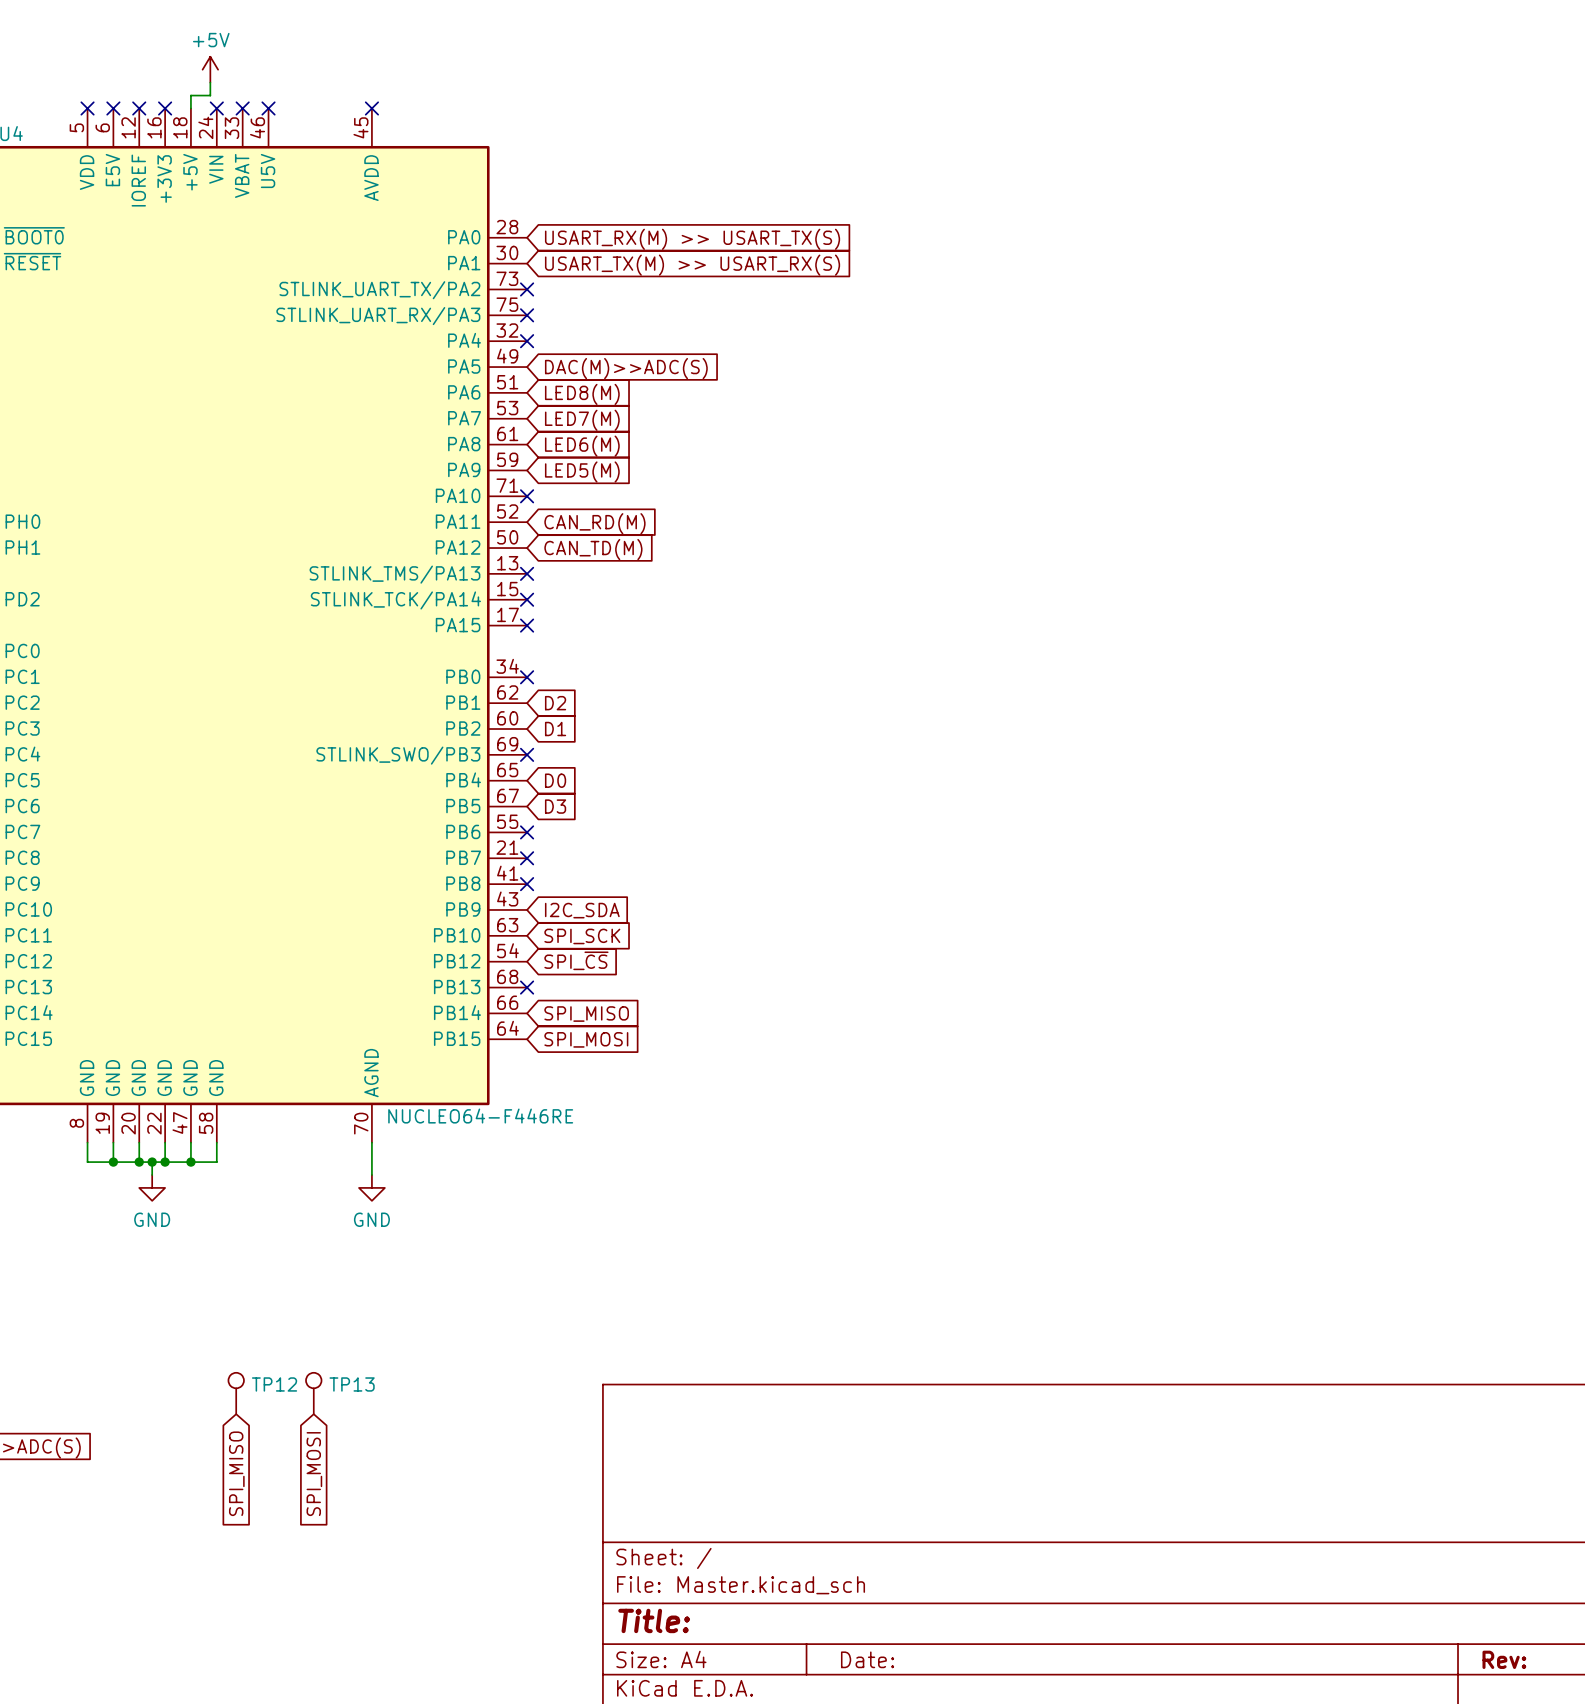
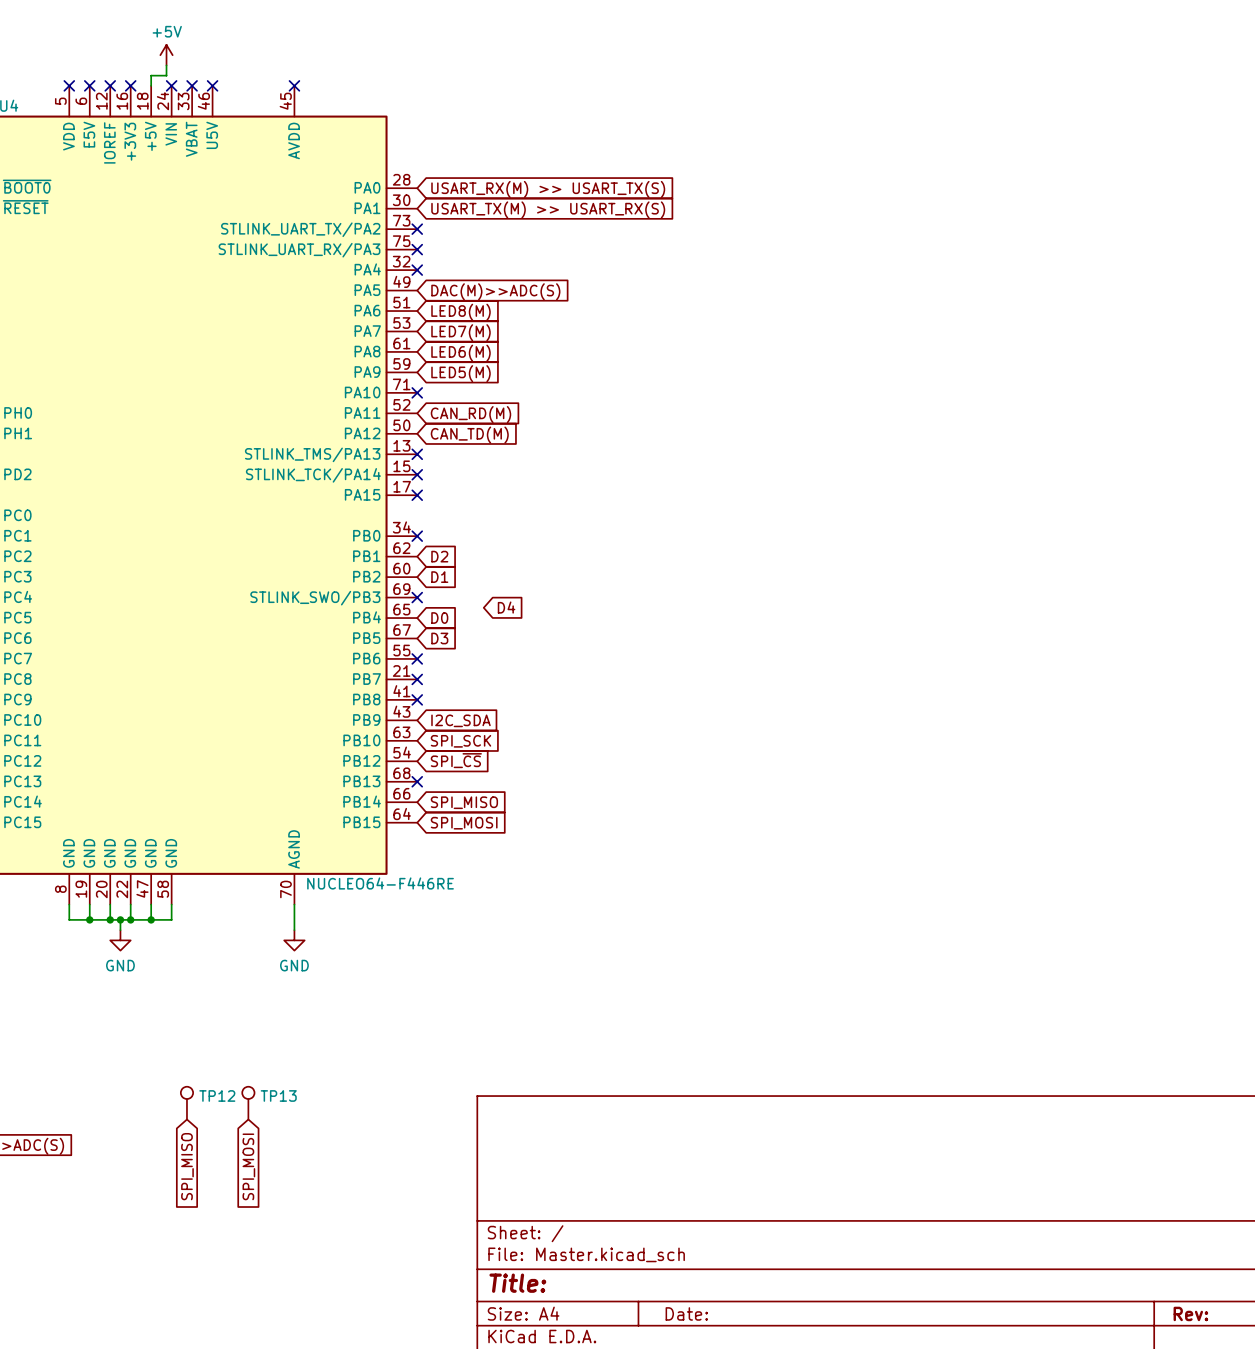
global label: none -> D4 (506, 607)

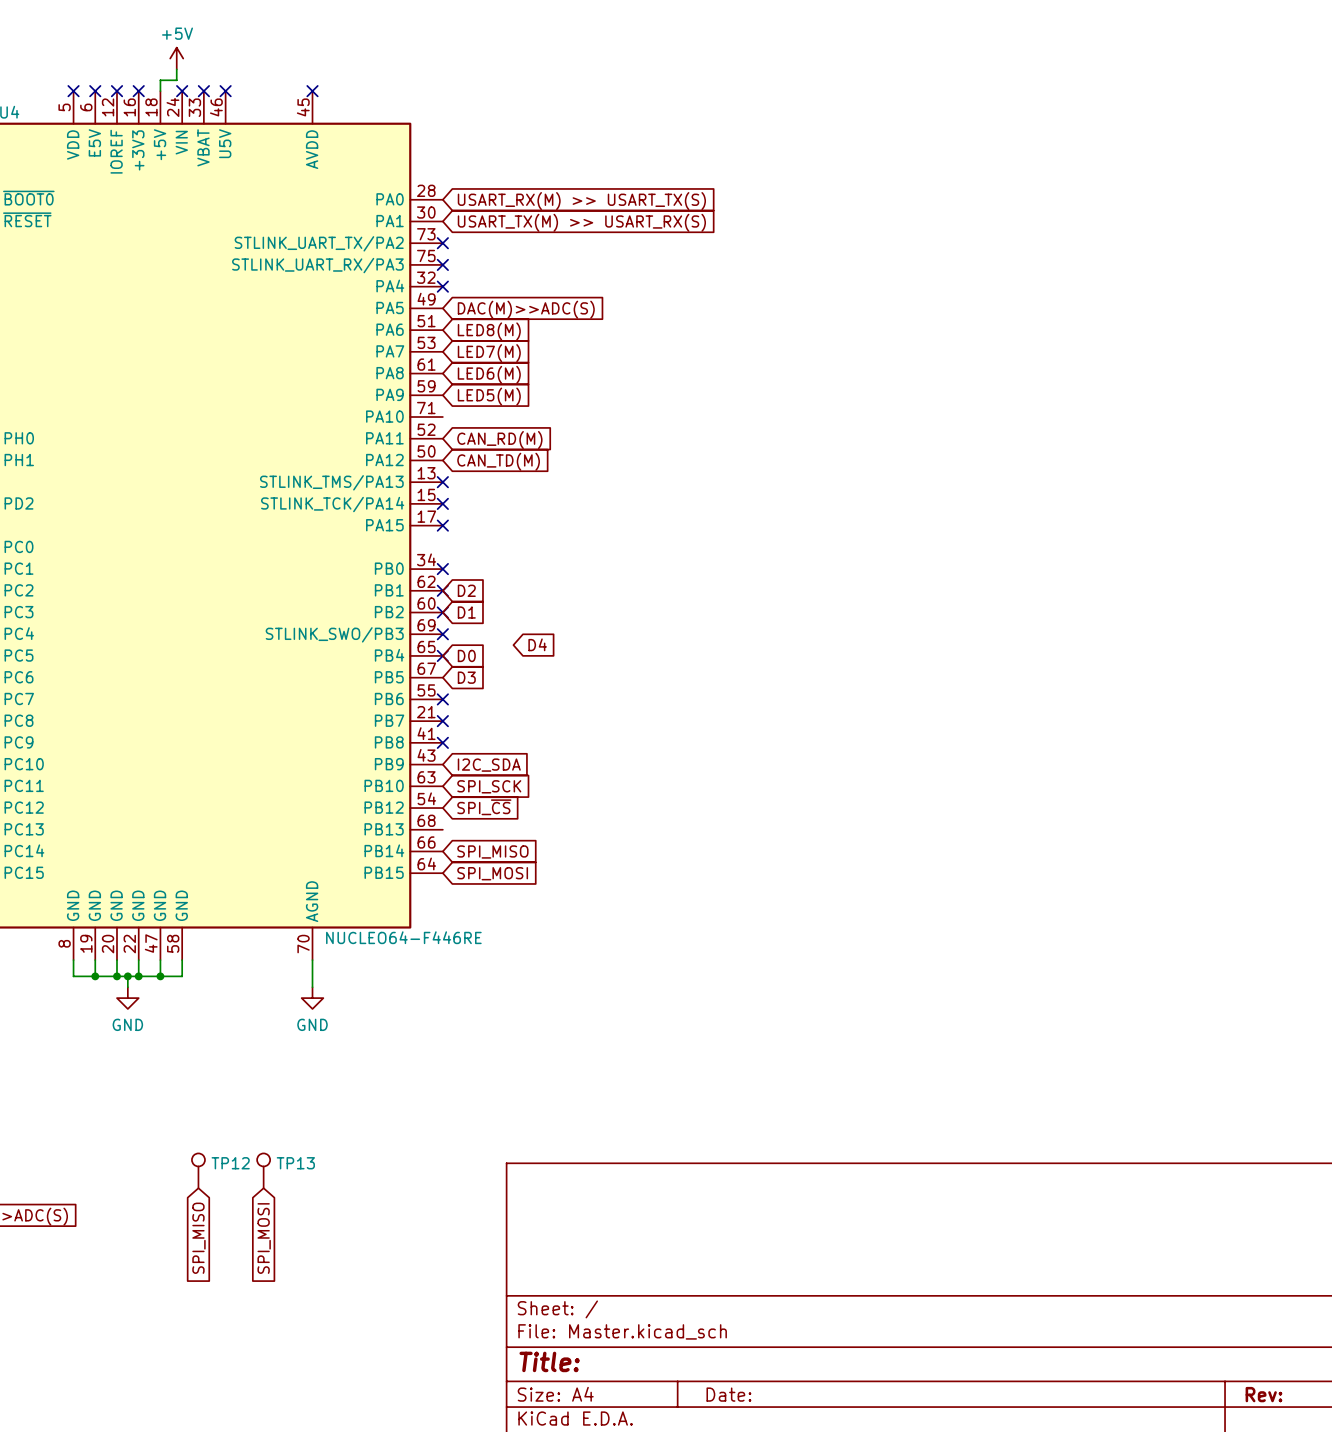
no-connect mark: (417, 392) -> none
no-connect mark: none -> (442, 590)
no-connect mark: none -> (442, 612)
no-connect mark: none -> (442, 655)
no-connect mark: (417, 781) -> none

